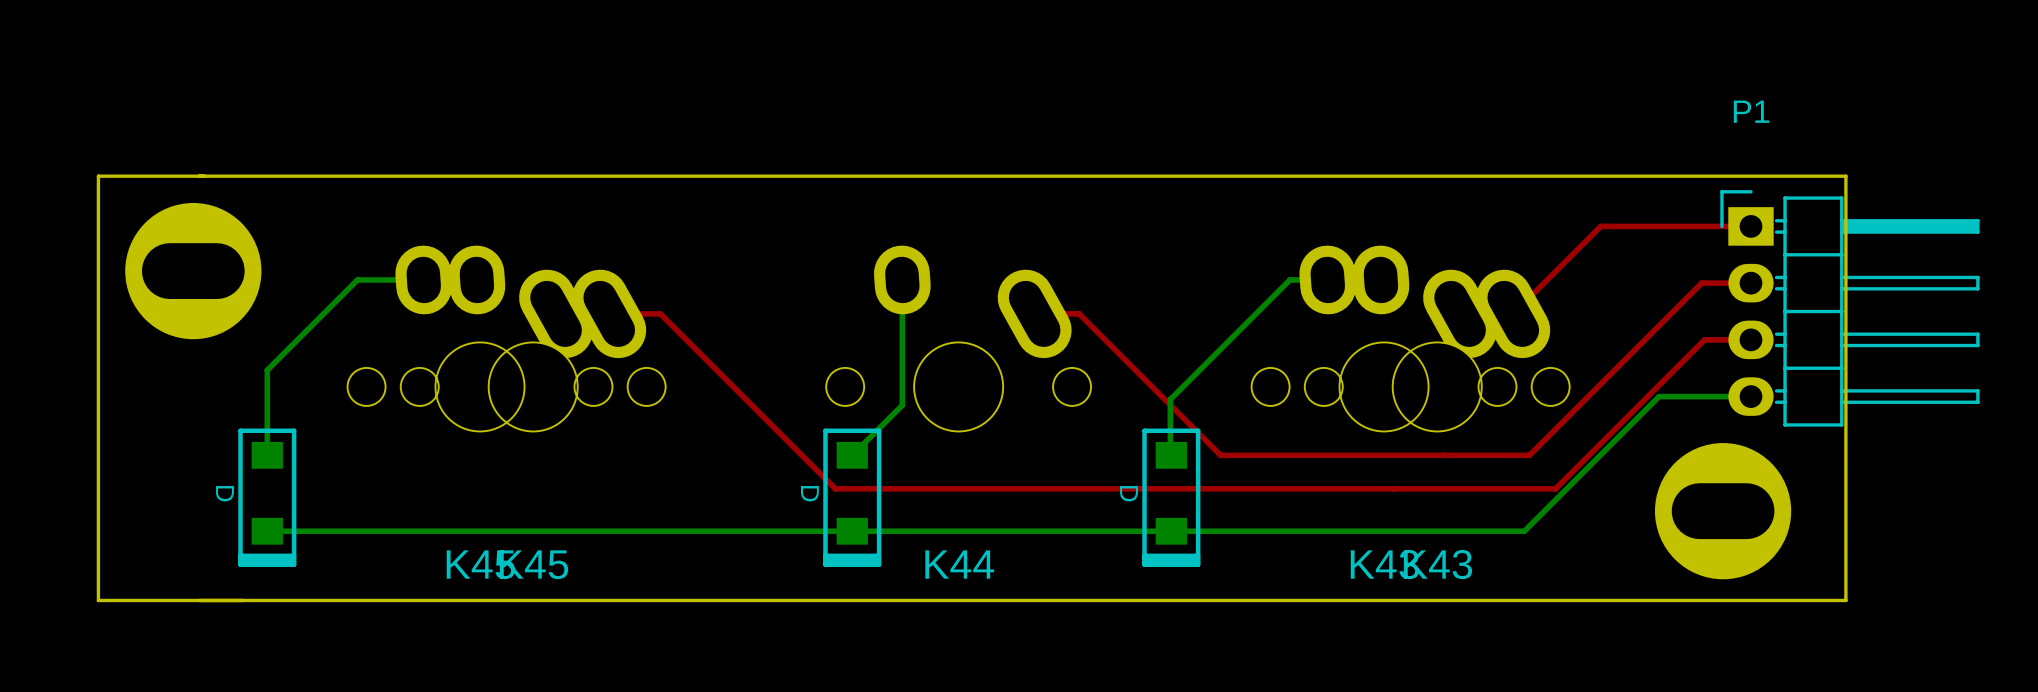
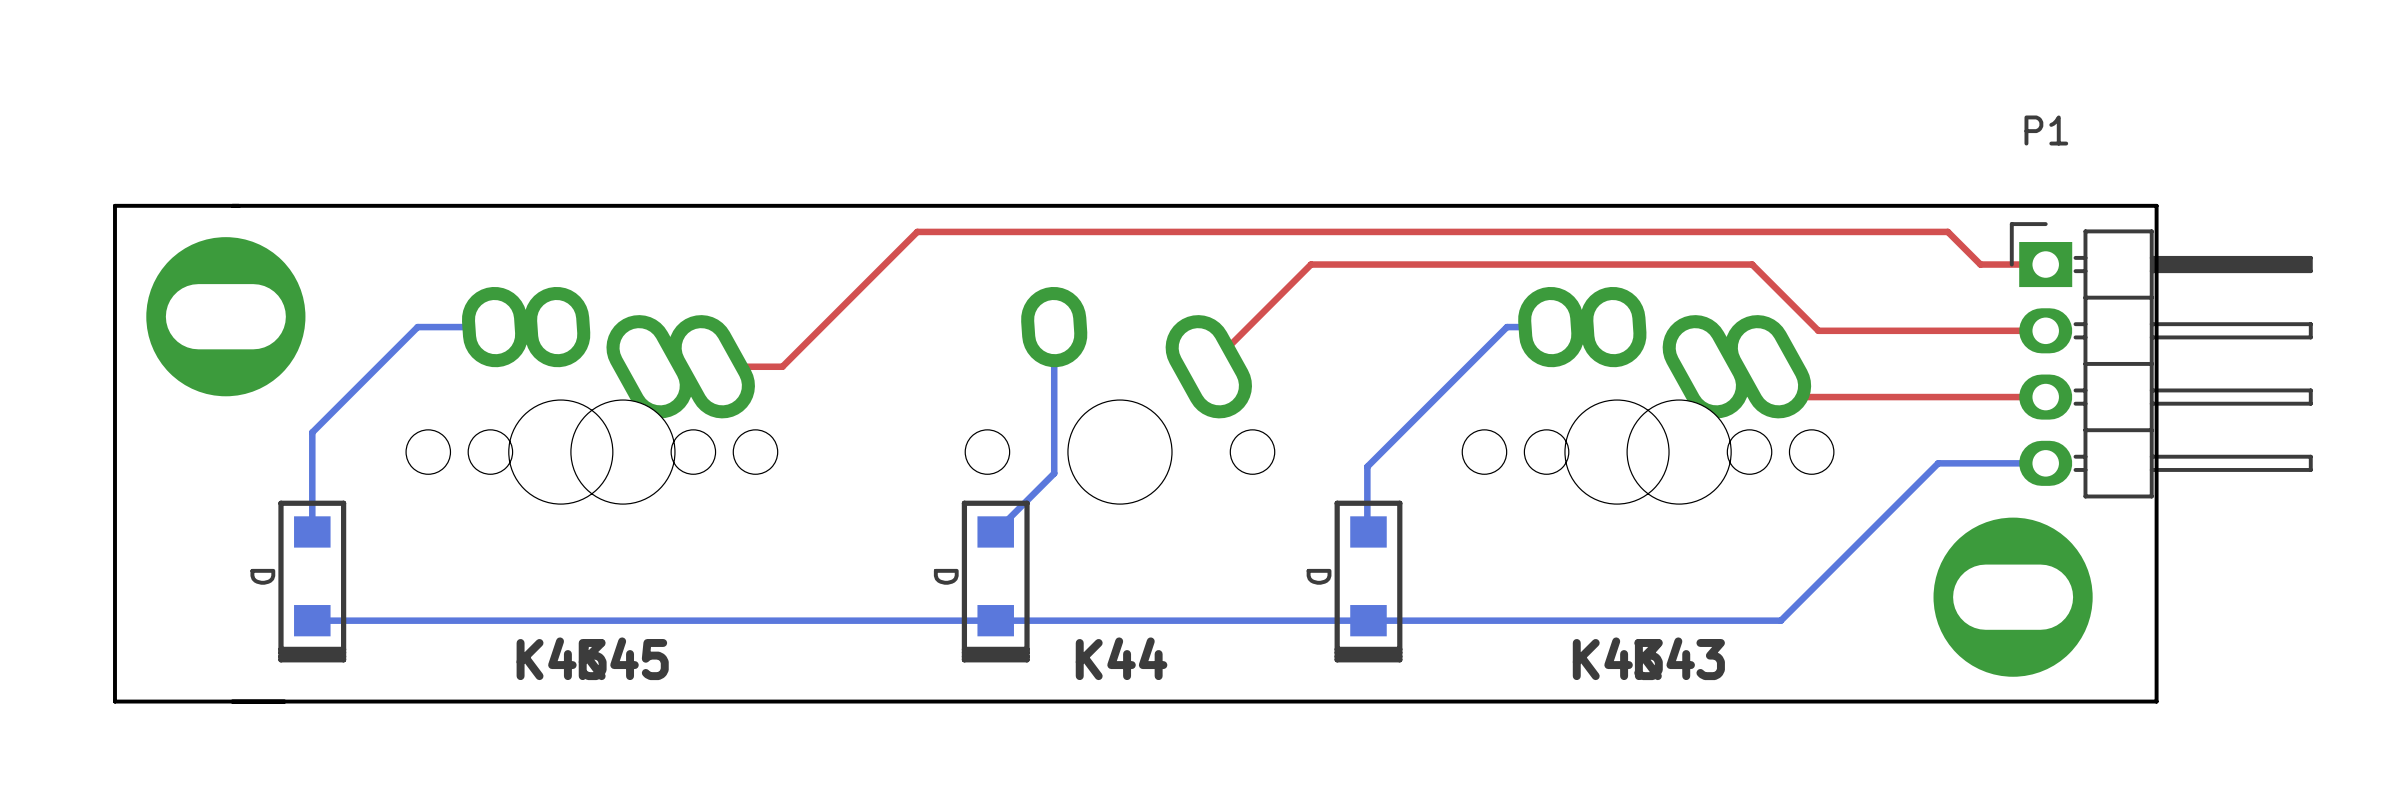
top track: (1695, 226) (1600, 226) (1528, 299) -> none
top track: (1701, 283) (1529, 455) (1220, 455) (1079, 313) (1034, 313) -> (1988, 330) (1818, 330) (1752, 264) (1311, 264) (1208, 366)
top track: (660, 313) (835, 488) (1555, 488) (1704, 339) -> (771, 366) (782, 366) (917, 231) (1947, 231) (1980, 264)
top track: none -> (1767, 366) (1798, 397) (1991, 397)

